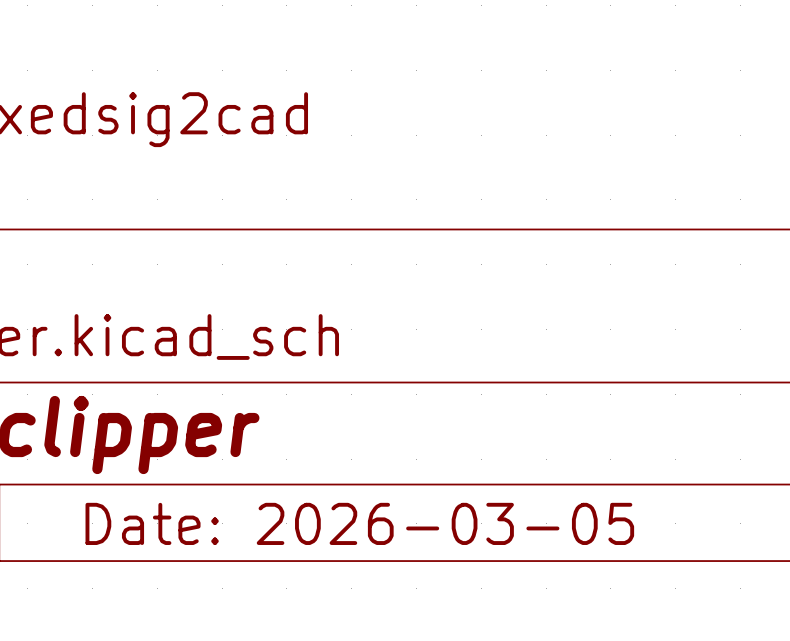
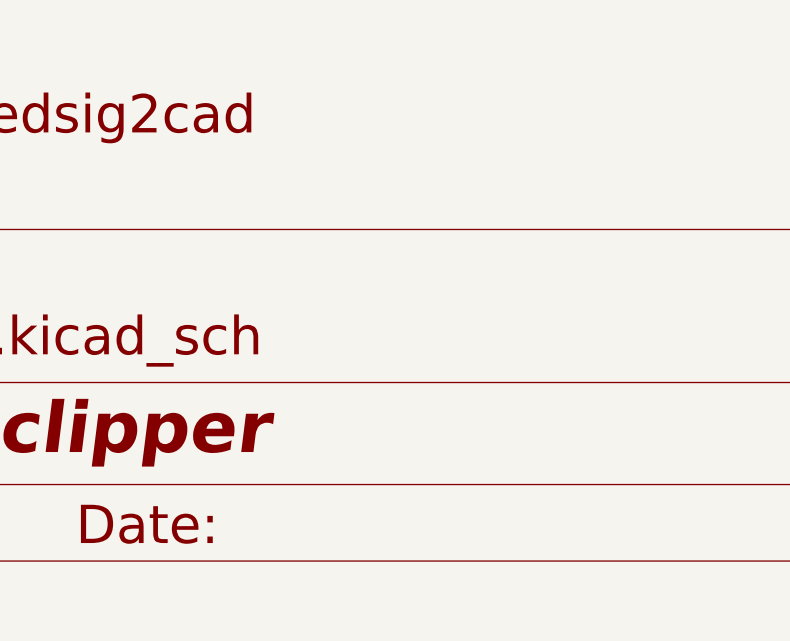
title block: Date: 2026-03-05 (359, 523) -> Date: (146, 524)

